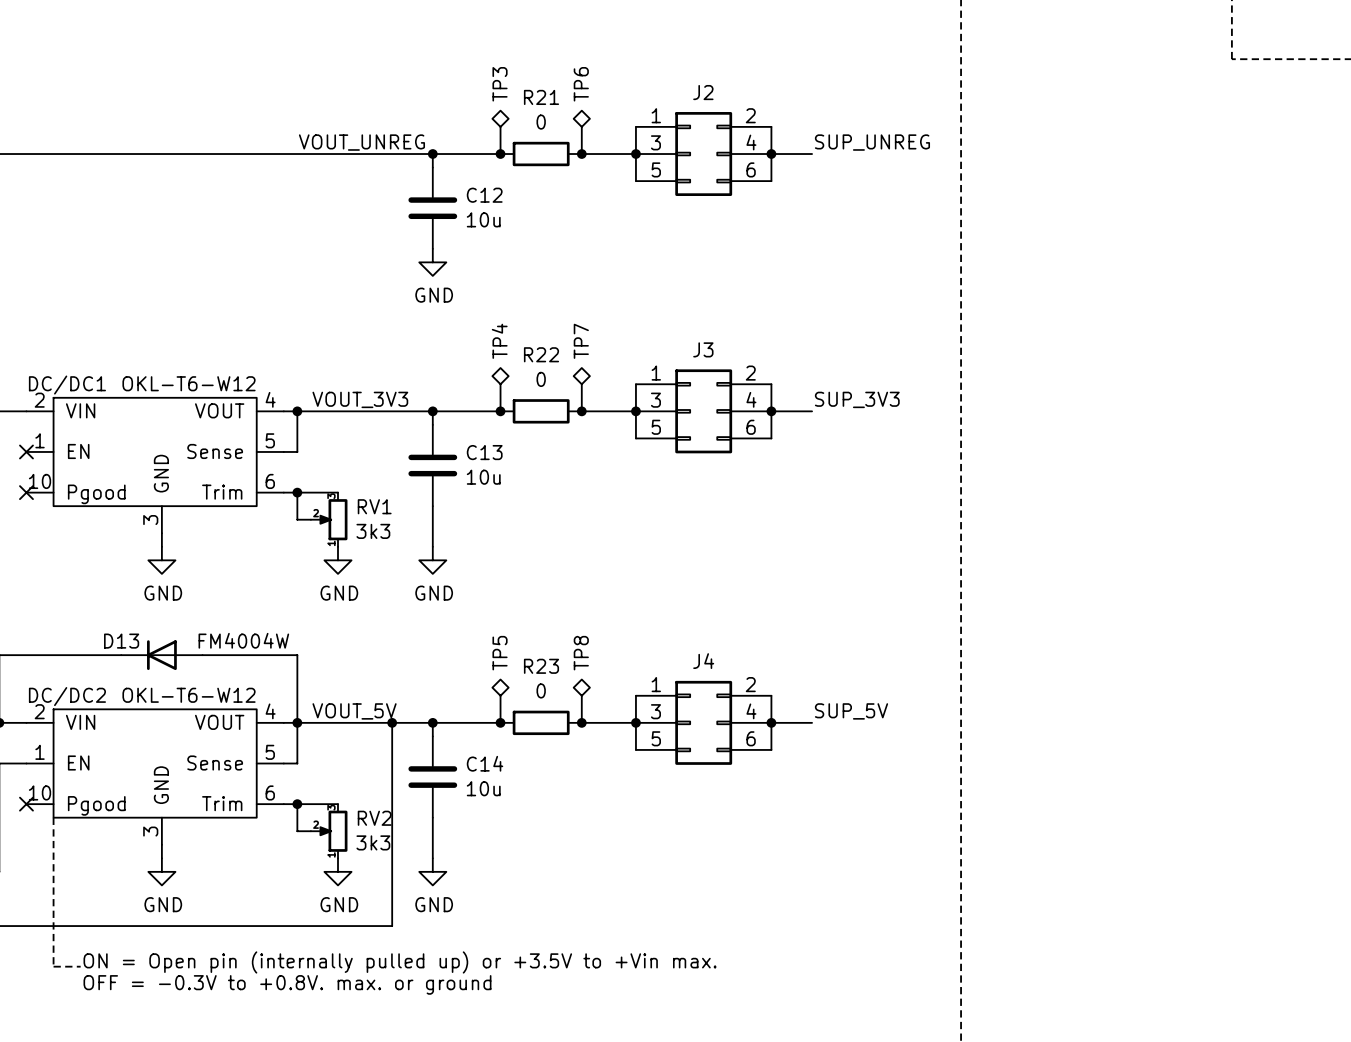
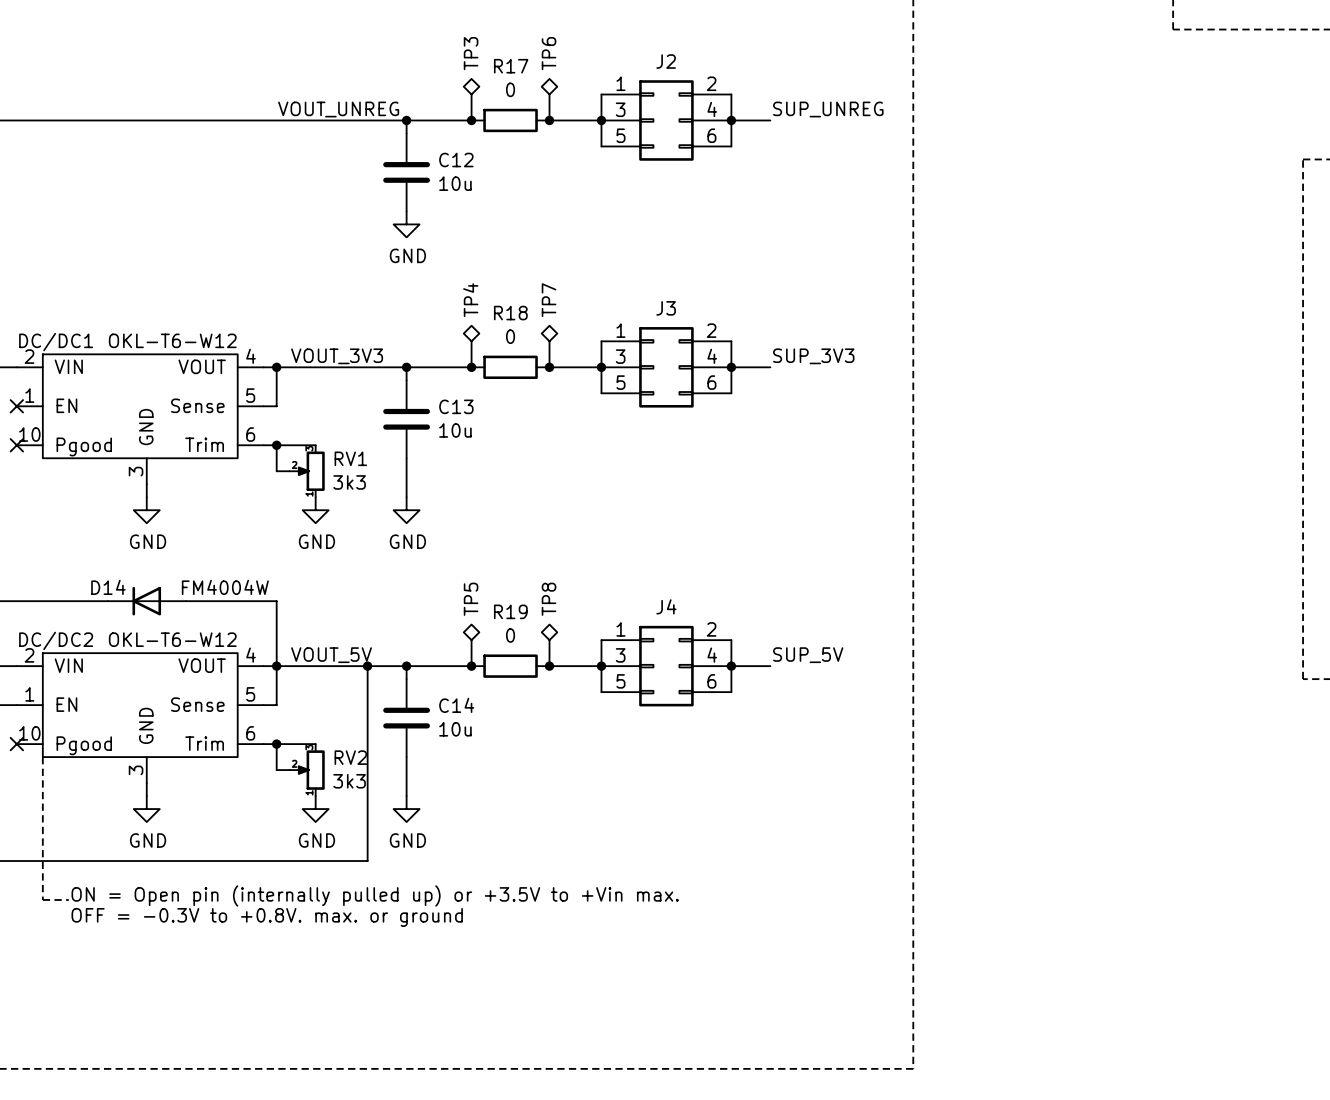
R21 name: R21 (541, 97) -> R17 (511, 66)
R22 name: R22 (541, 354) -> R18 (510, 313)
D13 name: D13 (121, 641) -> D14 (108, 587)
R23 name: R23 (541, 666) -> R19 (510, 611)

